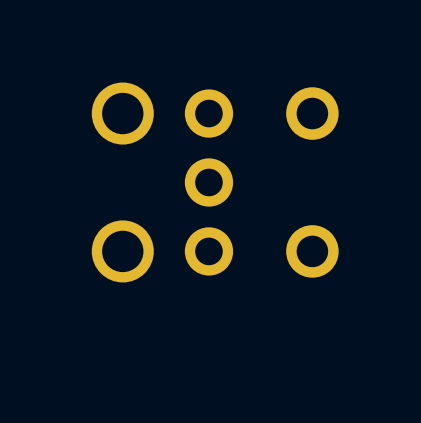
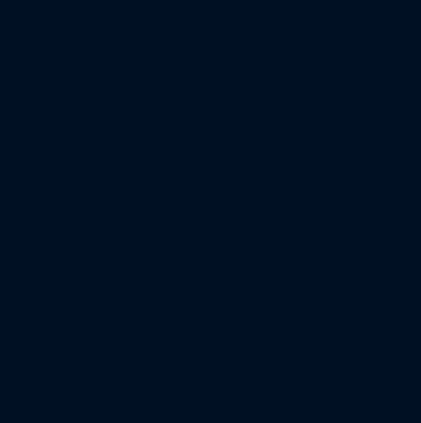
part: (215, 182) -> none

